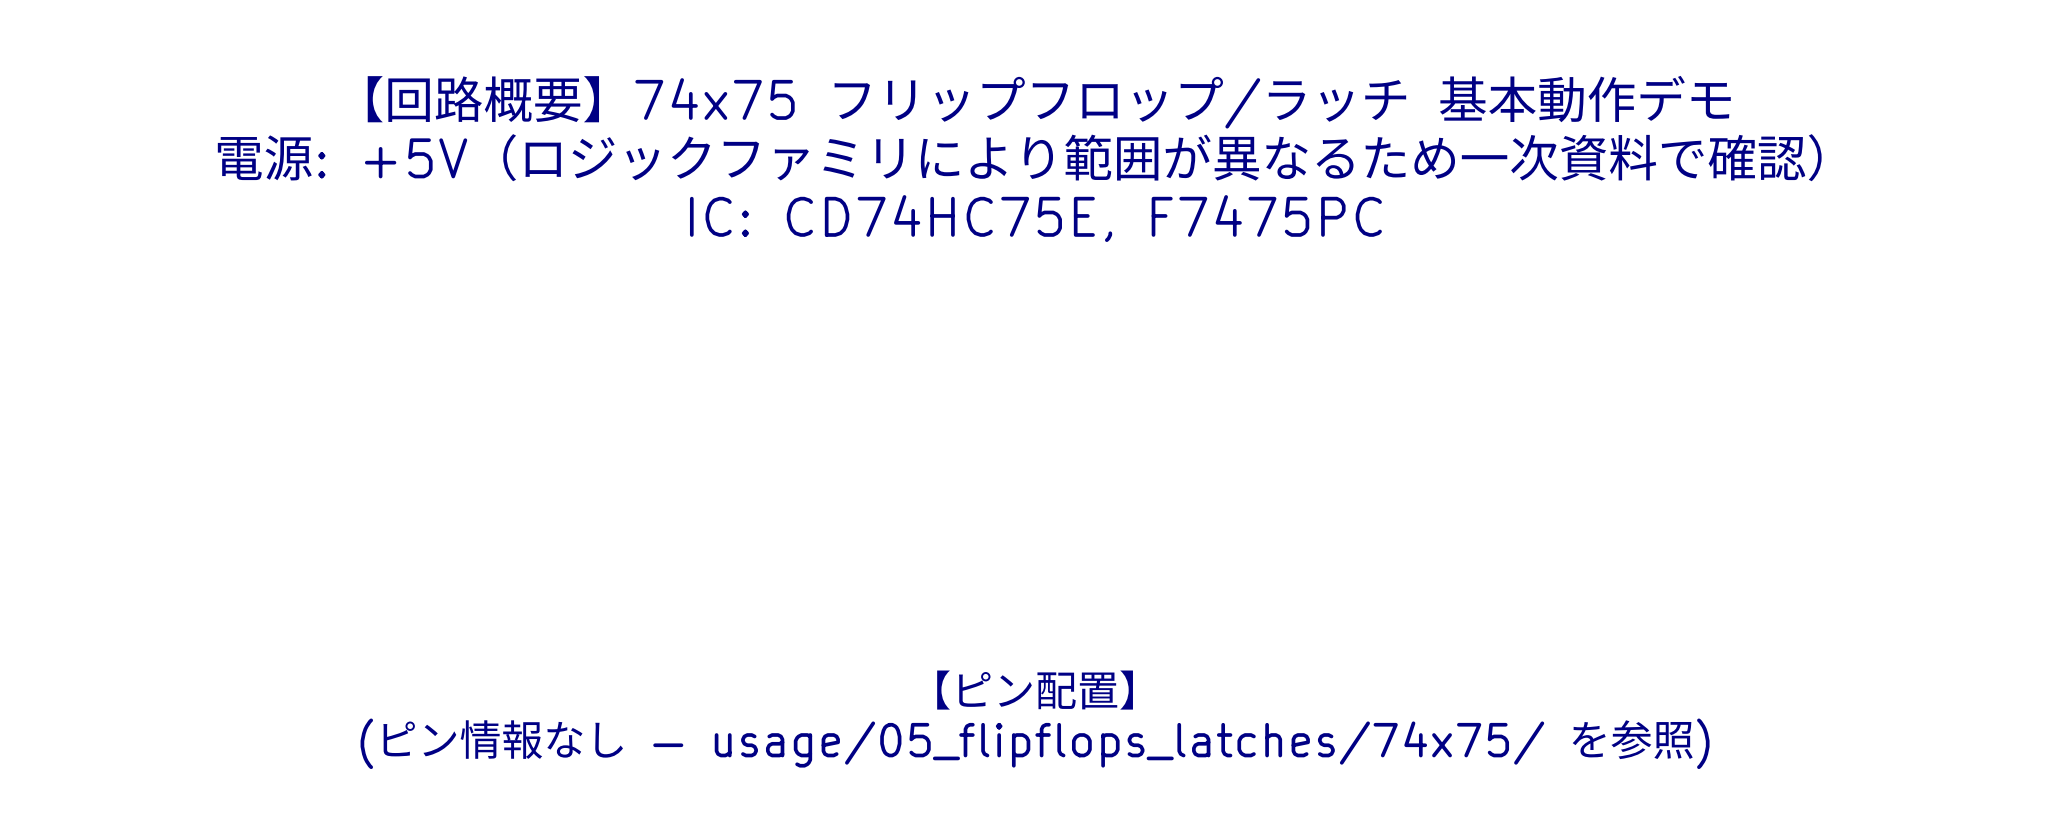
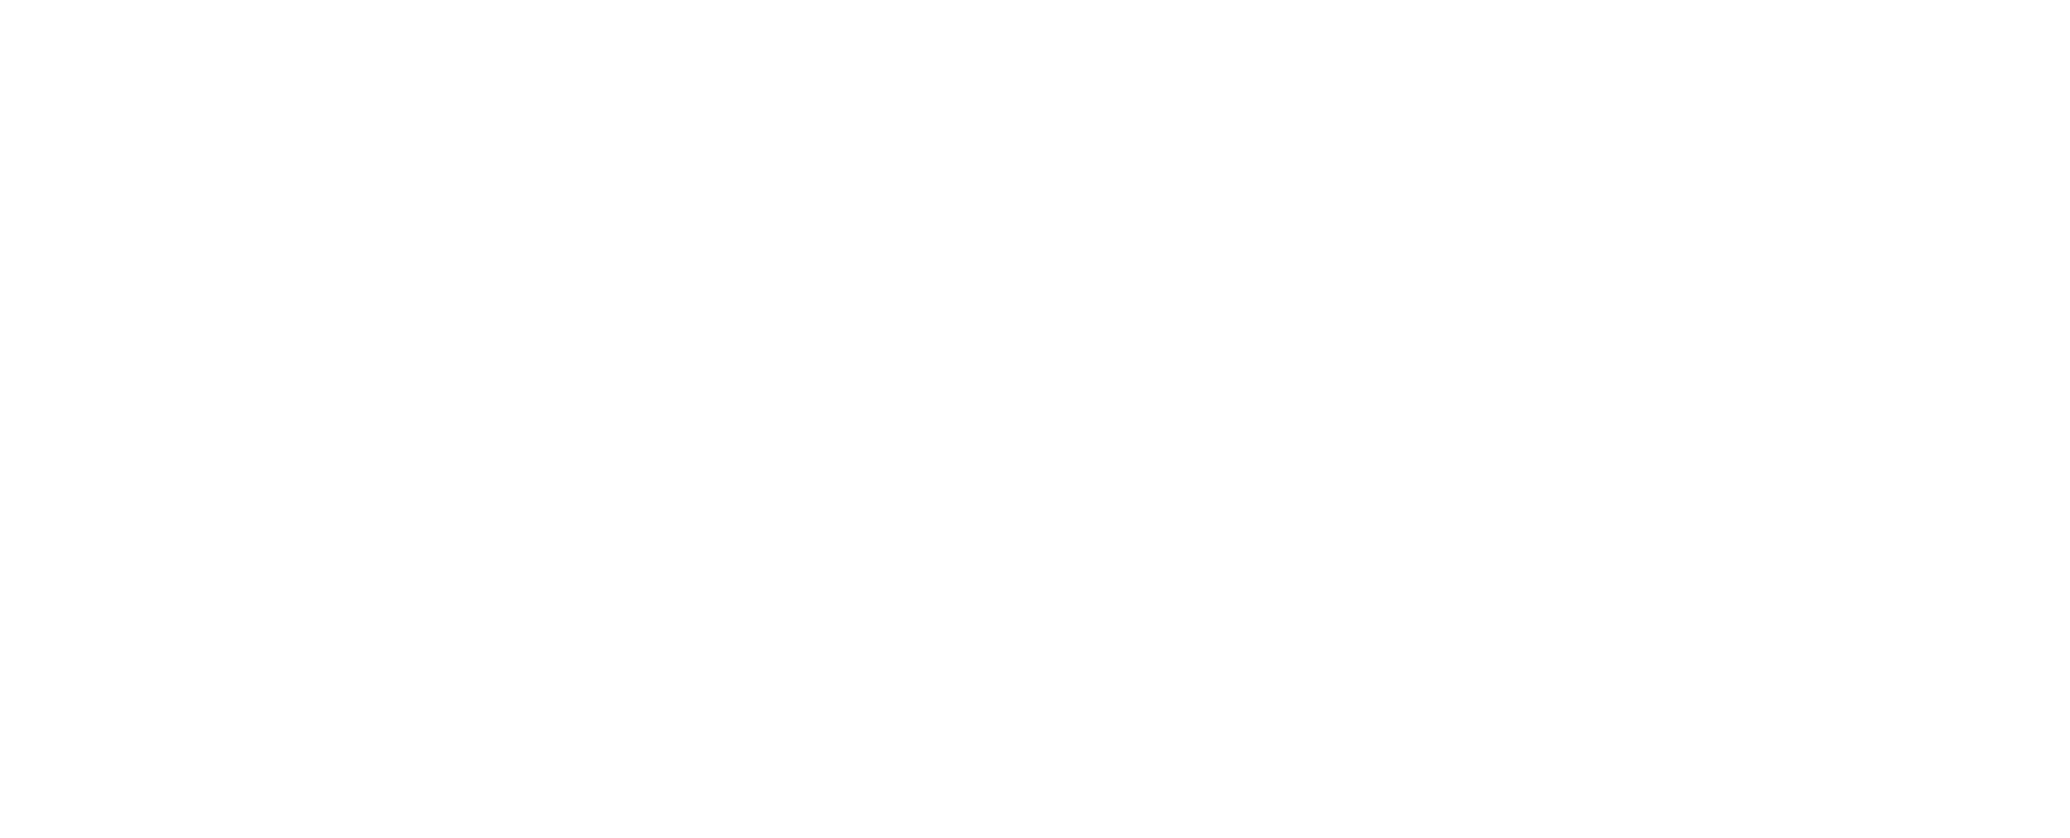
text: 【回路概要】74x75 フリップフロップ/ラッチ 基本動作デモ (1049, 101) -> none
text: 電源: +5V（ロジックファミリにより範囲が異なるため一次資料で確認） (1019, 157) -> none
text: IC: CD74HC75E, F7475PC (1035, 218) -> none
text: 【ピン配置】 (1035, 690) -> none
text: (ピン情報なし — usage/05_flipflops_latches/74x75/ を参照) (1035, 743) -> none

